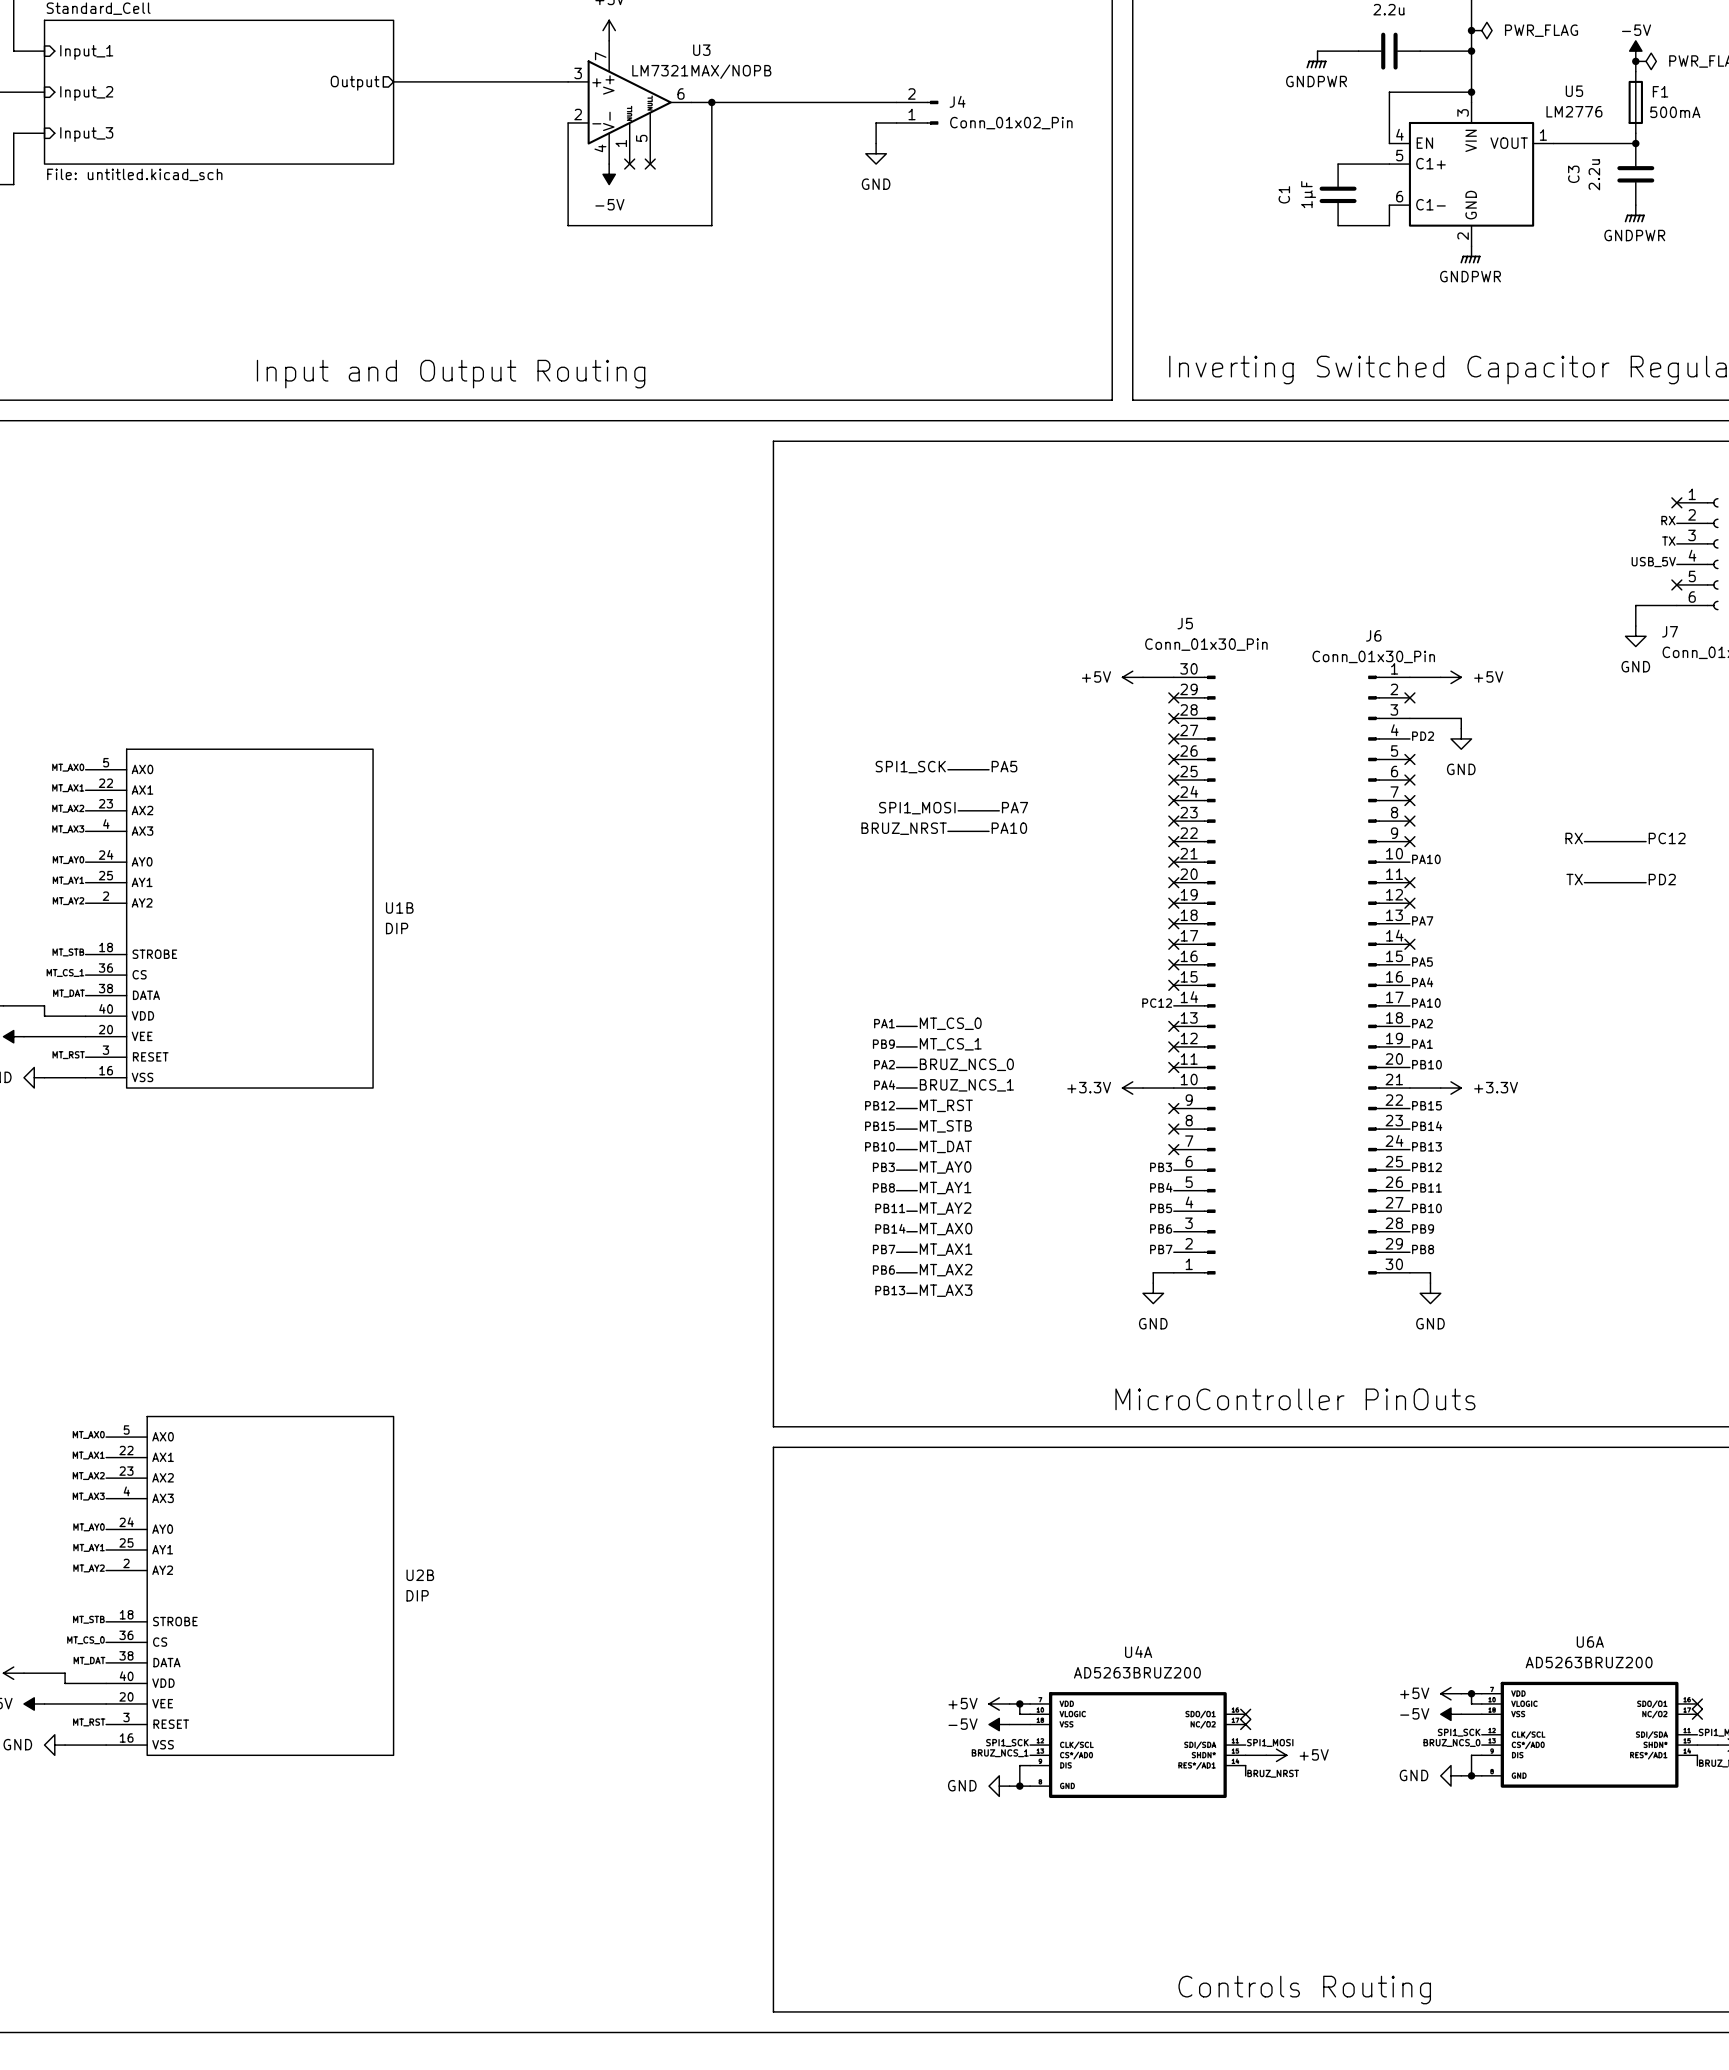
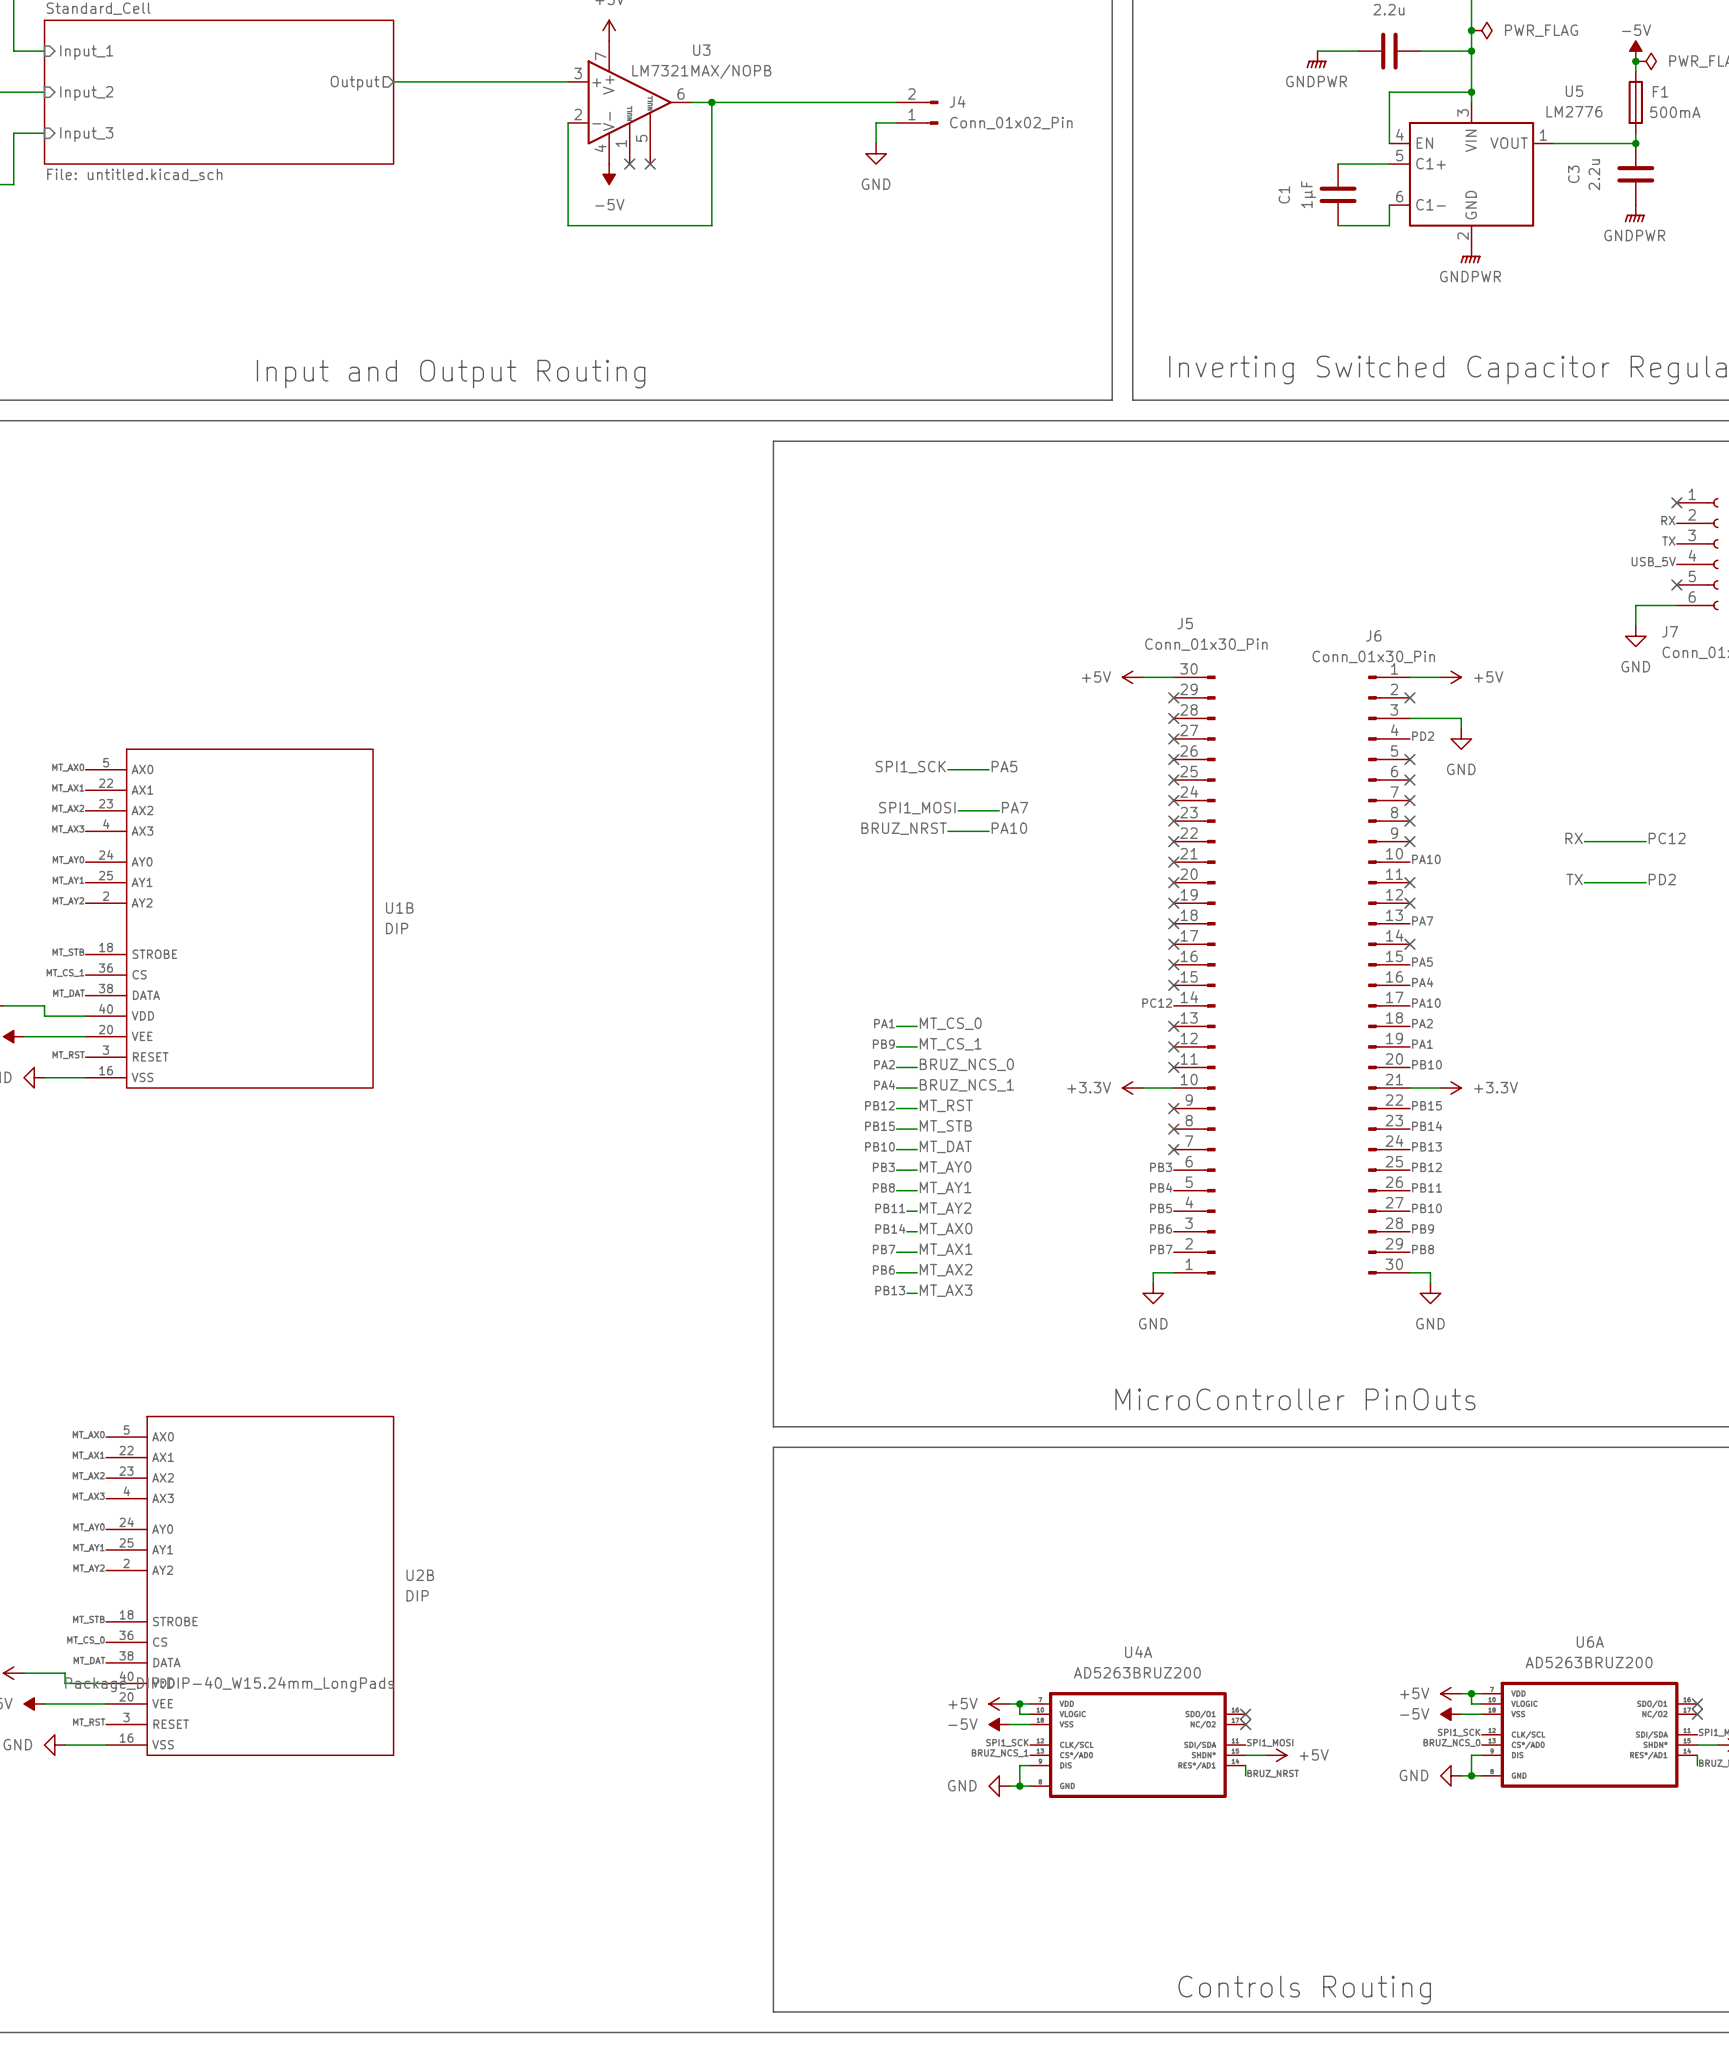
U2B text: none -> Package_DIP:DIP-40_W15.24mm_LongPads (229, 1684)

